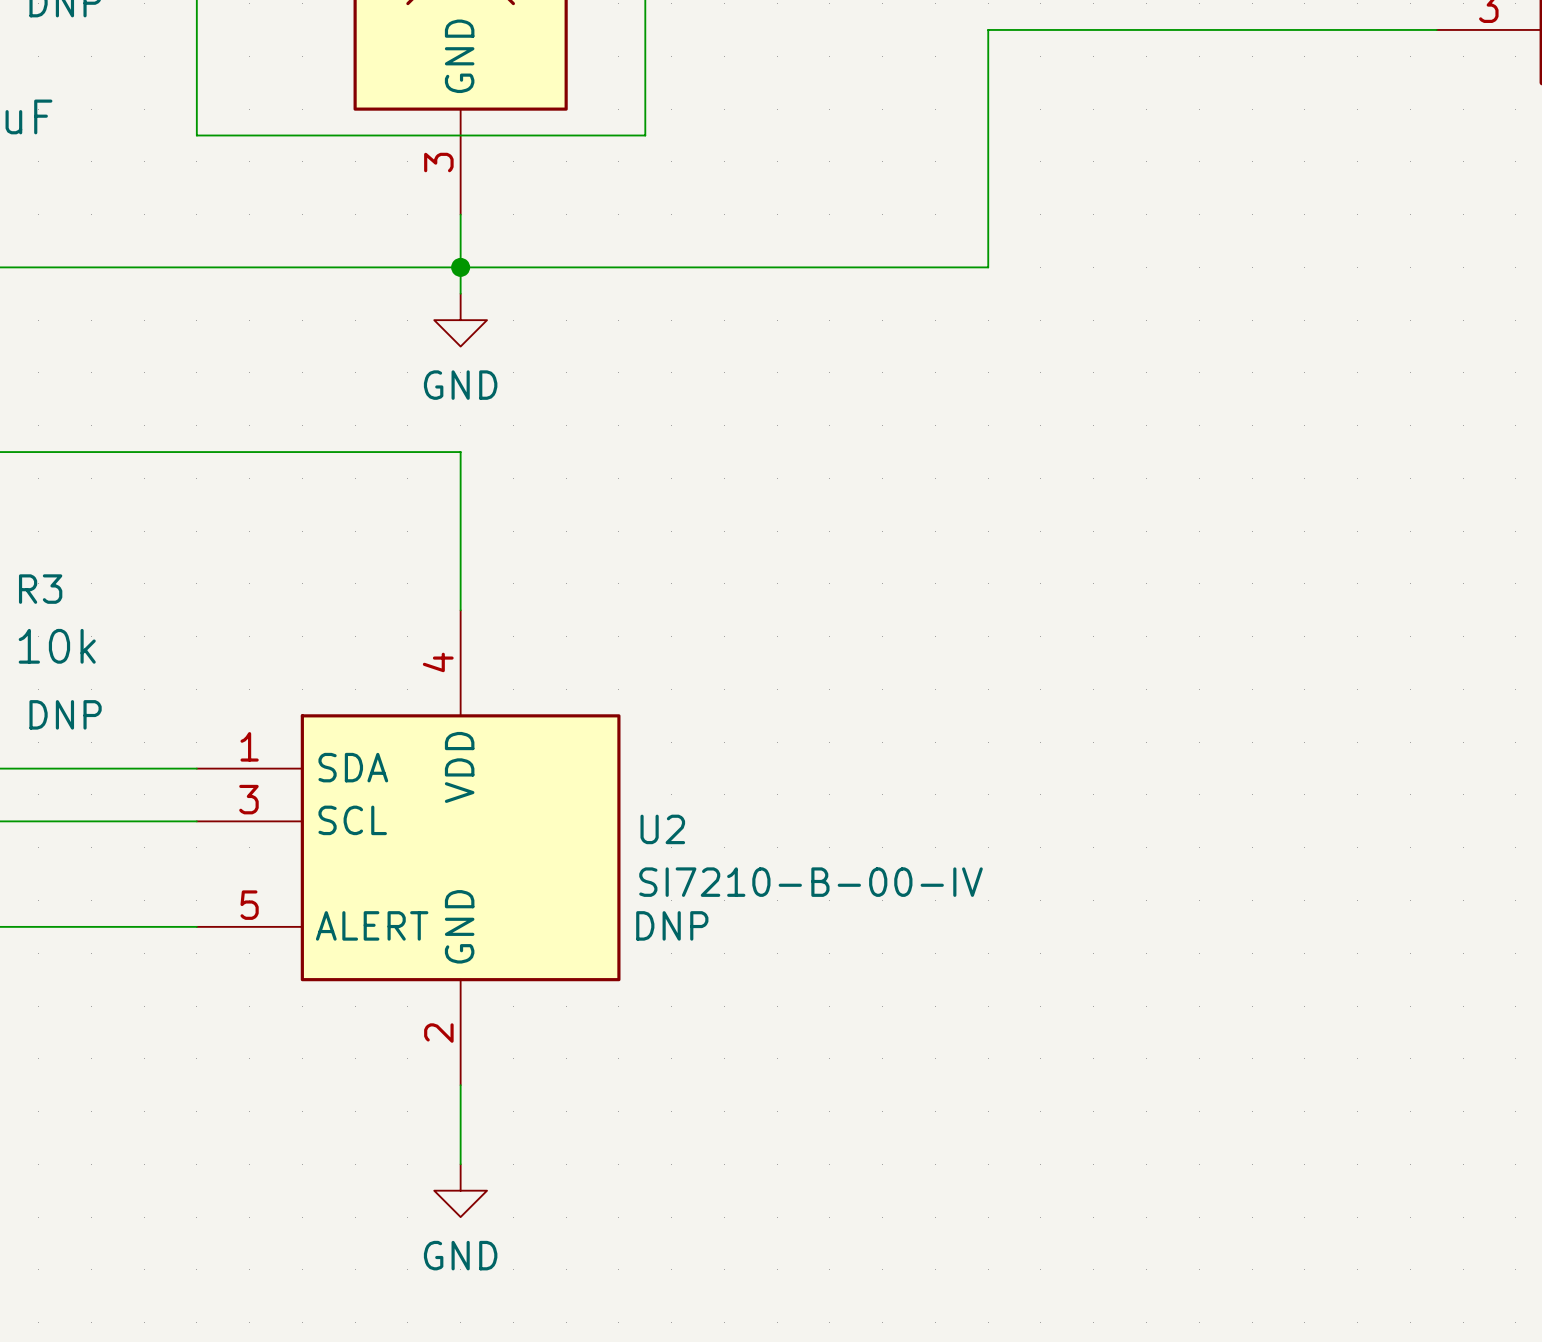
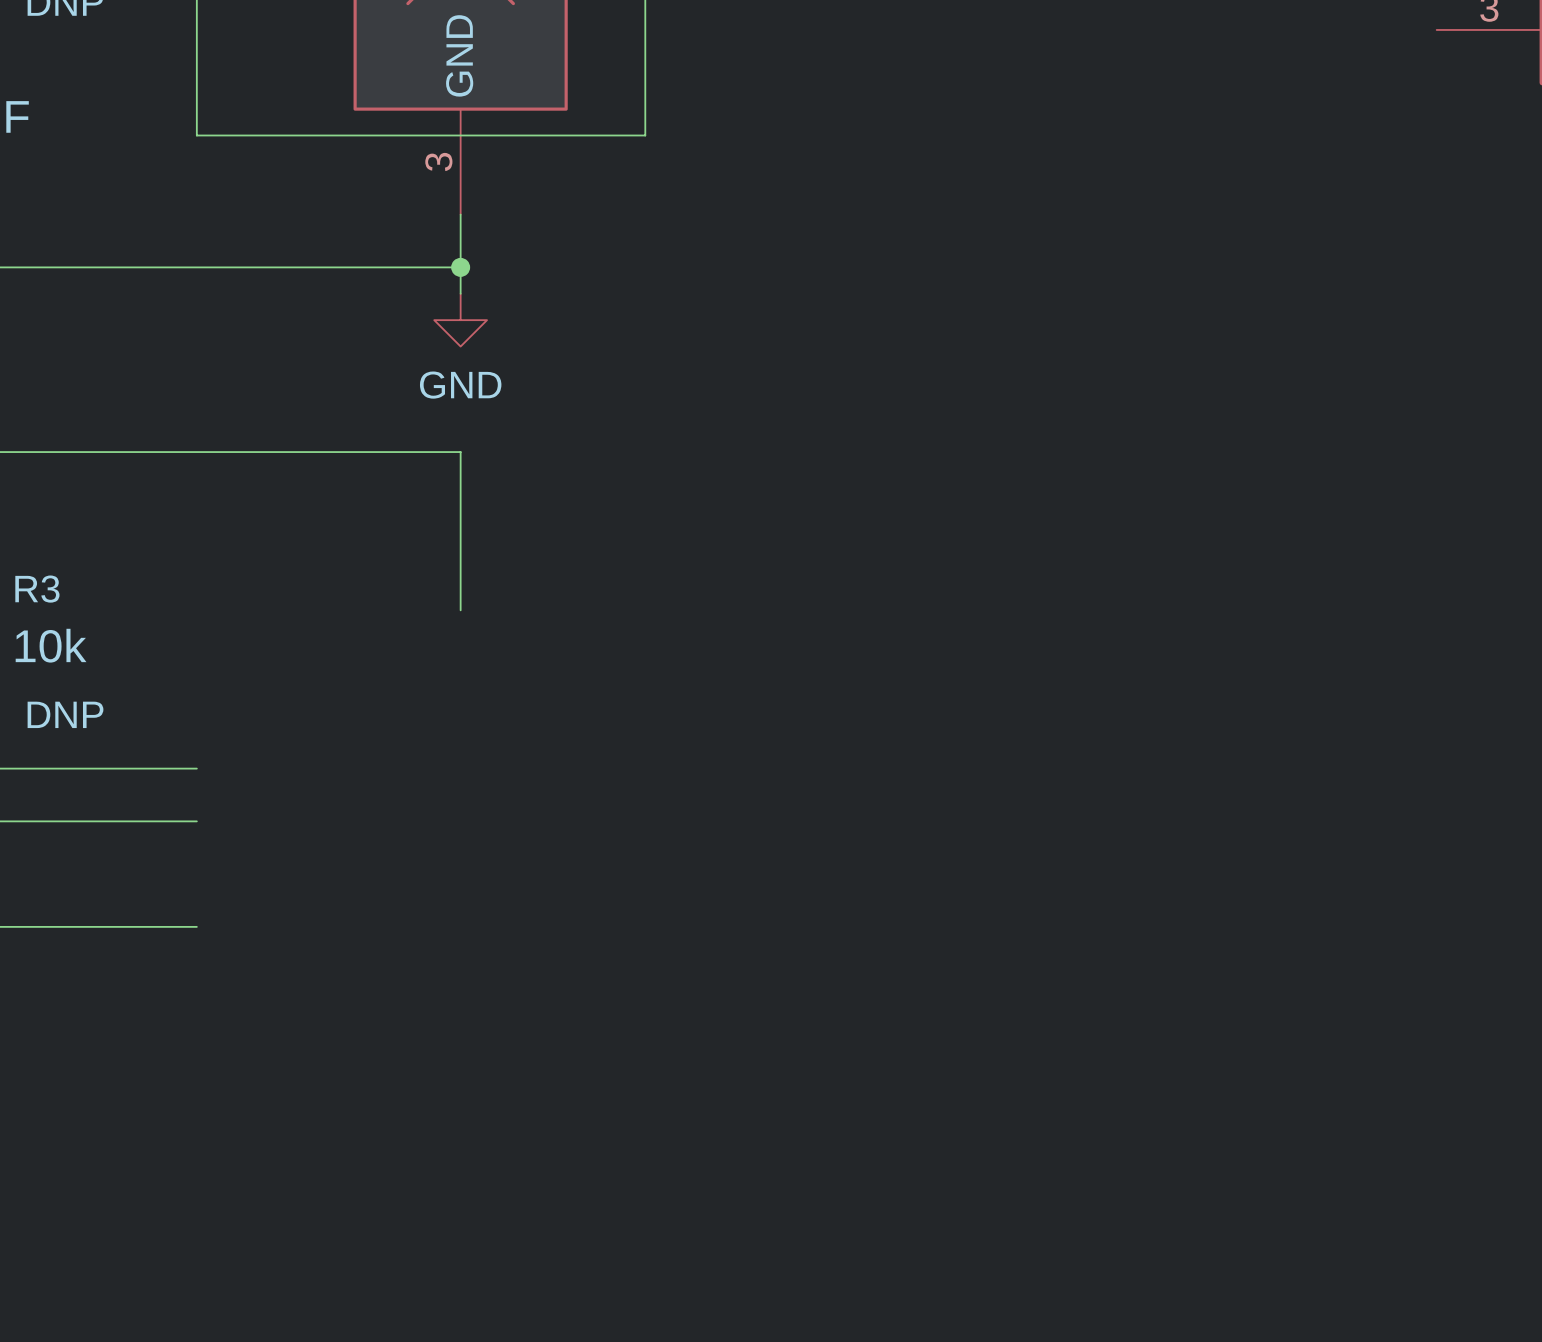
wire: (1436, 29) (988, 29) (988, 267) (460, 267) -> none
U2: (408, 847) -> none
wire: (460, 1085) (460, 1164) -> none
power symbol: GND (460, 1190) -> none

